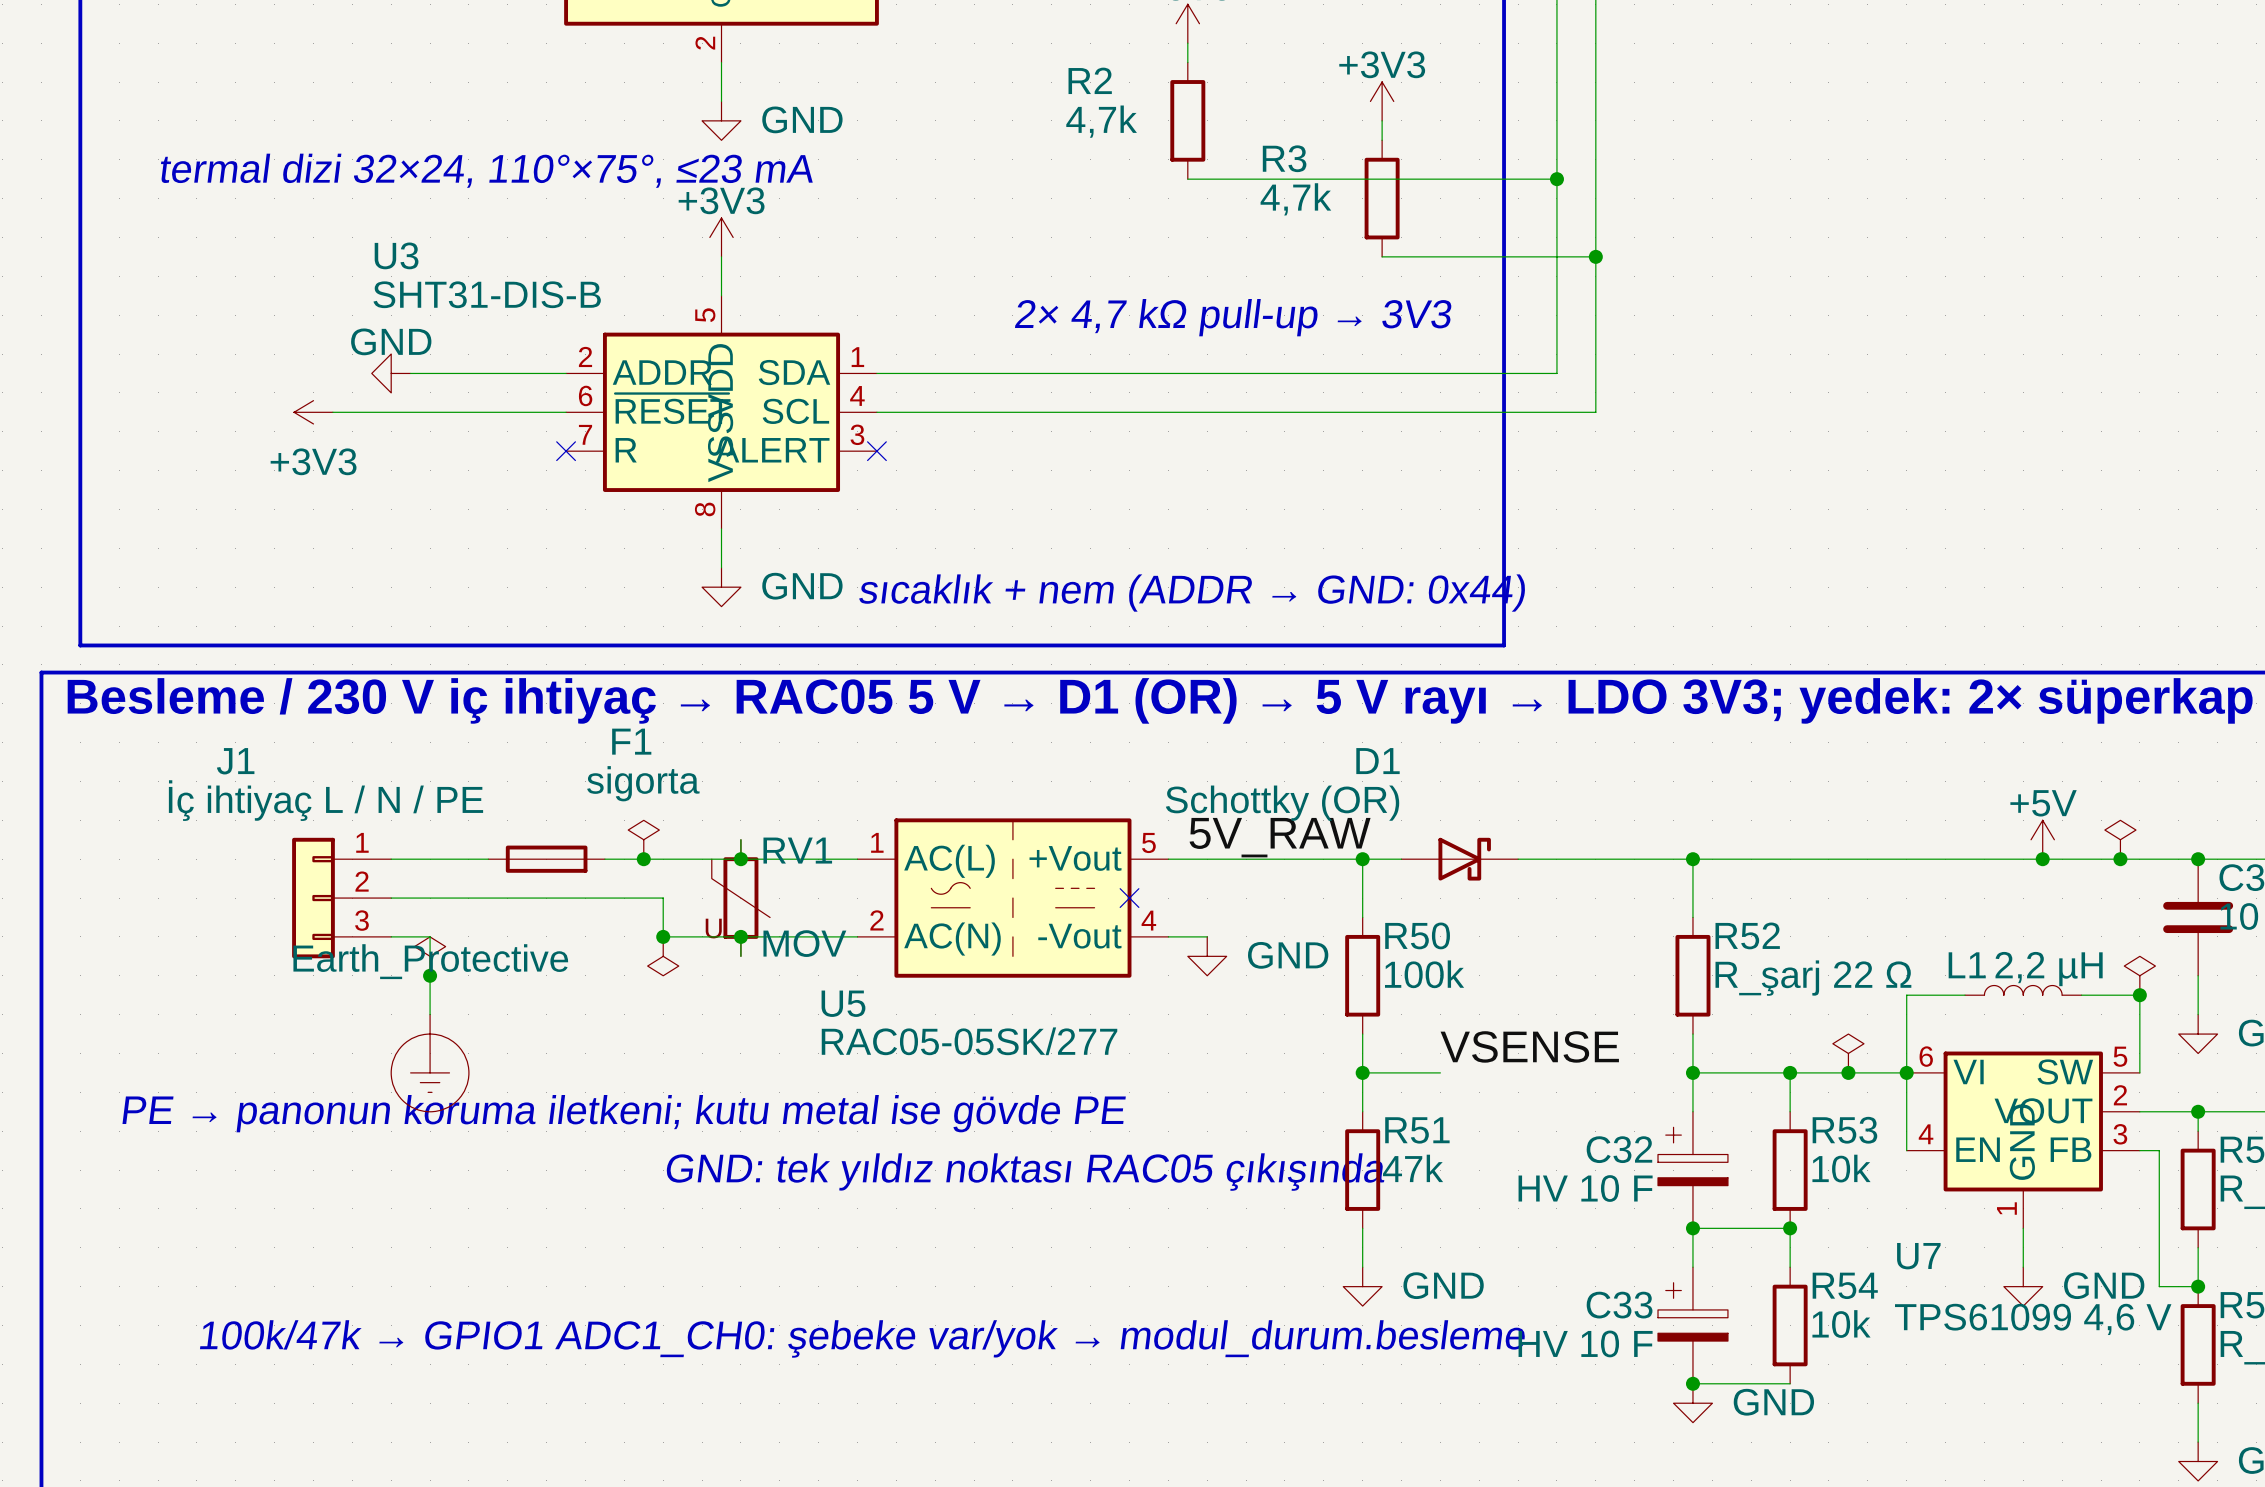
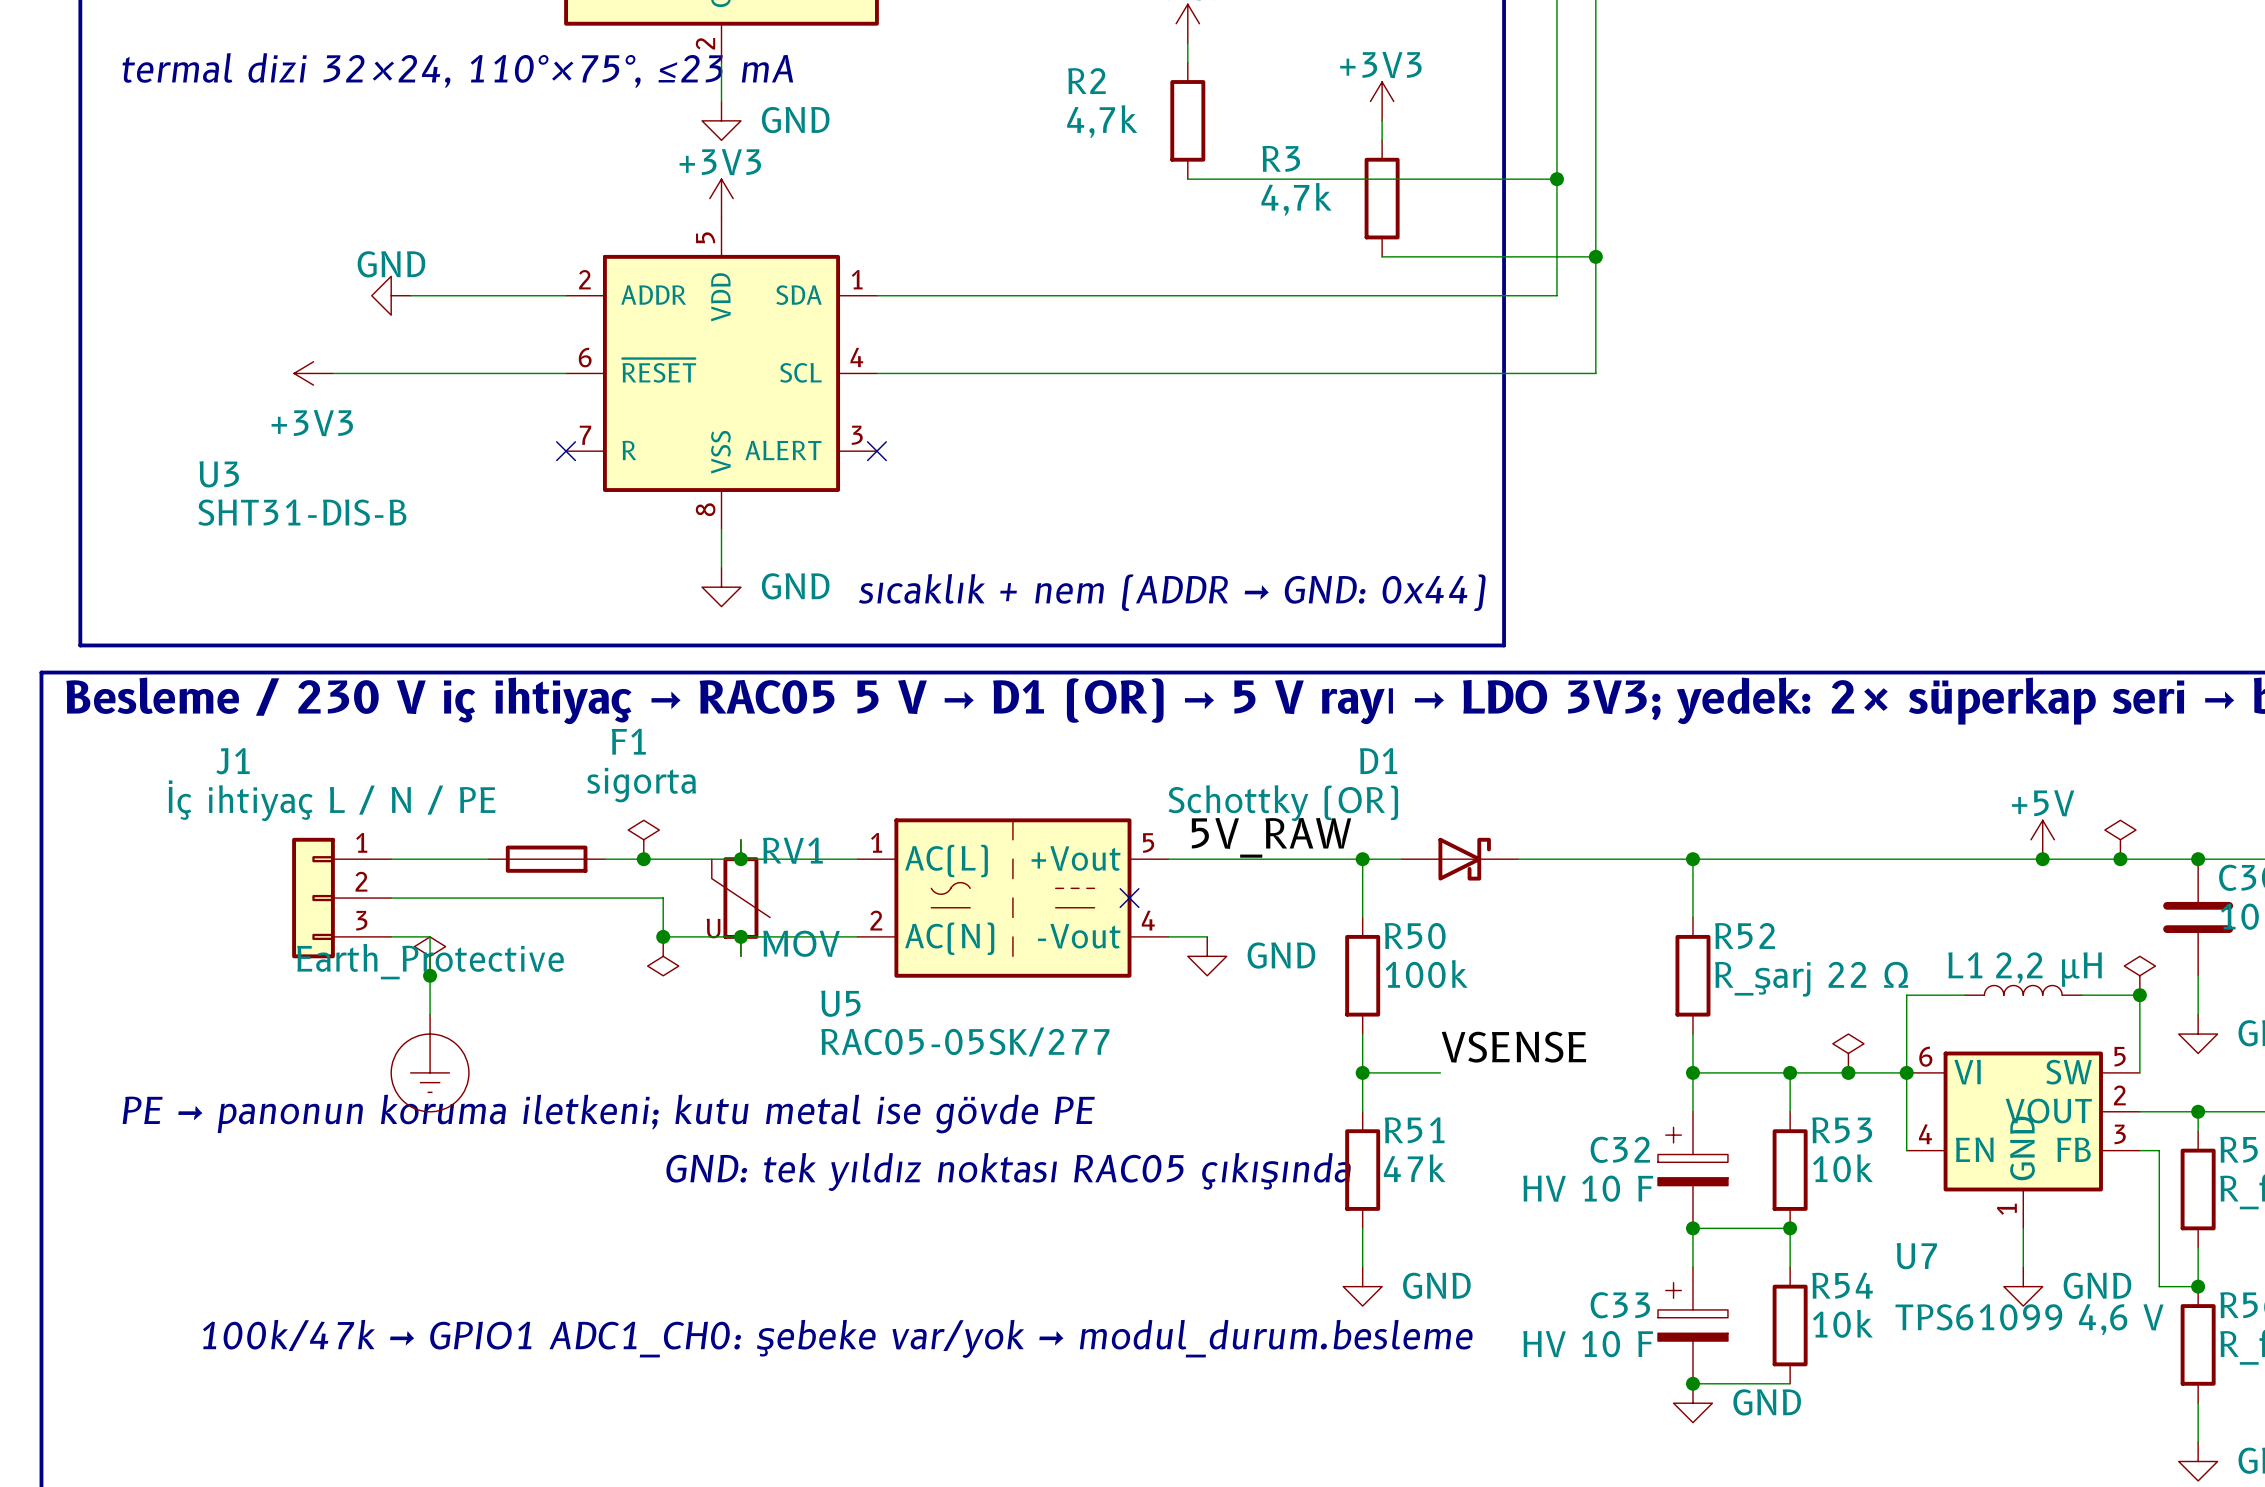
text position: termal dizi 32×24, 110°×75°, ≤23 mA (486, 170) -> termal dizi 32×24, 110°×75°, ≤23 mA (457, 70)
power symbol position: +3V3 (721, 237) -> +3V3 (721, 198)
U3 name position: U3 (396, 255) -> U3 (219, 474)
U3 value position: SHT31-DIS-B (487, 294) -> SHT31-DIS-B (302, 512)
wire: none -> (410, 295) (566, 295)
U3 symbol: [566, 295, 877, 529] -> [566, 218, 877, 529]
wire: none -> (876, 295) (1556, 295)
wire: (1556, 295) (1556, 373) -> (1595, 373) (1556, 373)
text: 2× 4,7 kΩ pull-up → 3V3 (1233, 317) -> none
wire: none -> (332, 373) (410, 373)
power symbol position: GND (391, 373) -> GND (391, 295)
wire: (1595, 373) (1595, 412) (876, 412) -> none
power symbol position: +3V3 (313, 412) -> +3V3 (313, 373)
wire: (332, 412) (566, 412) -> none

